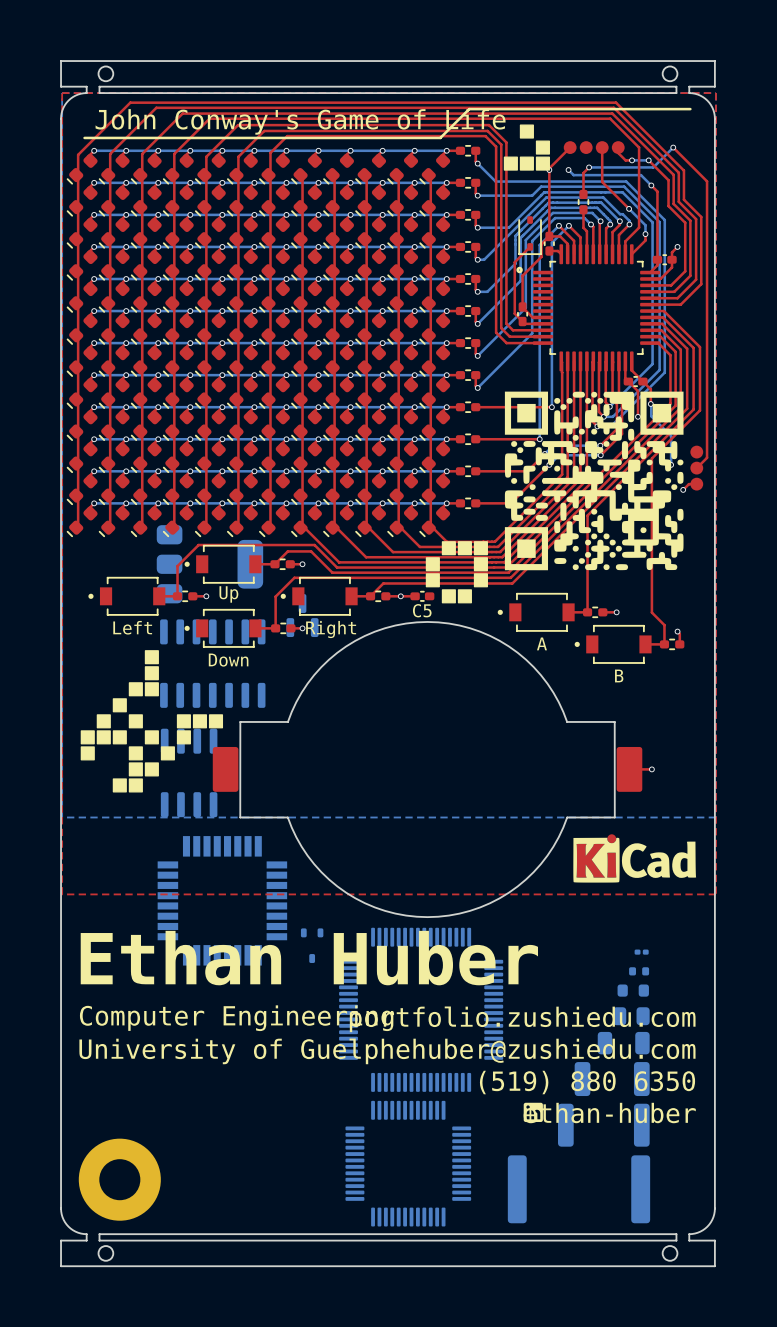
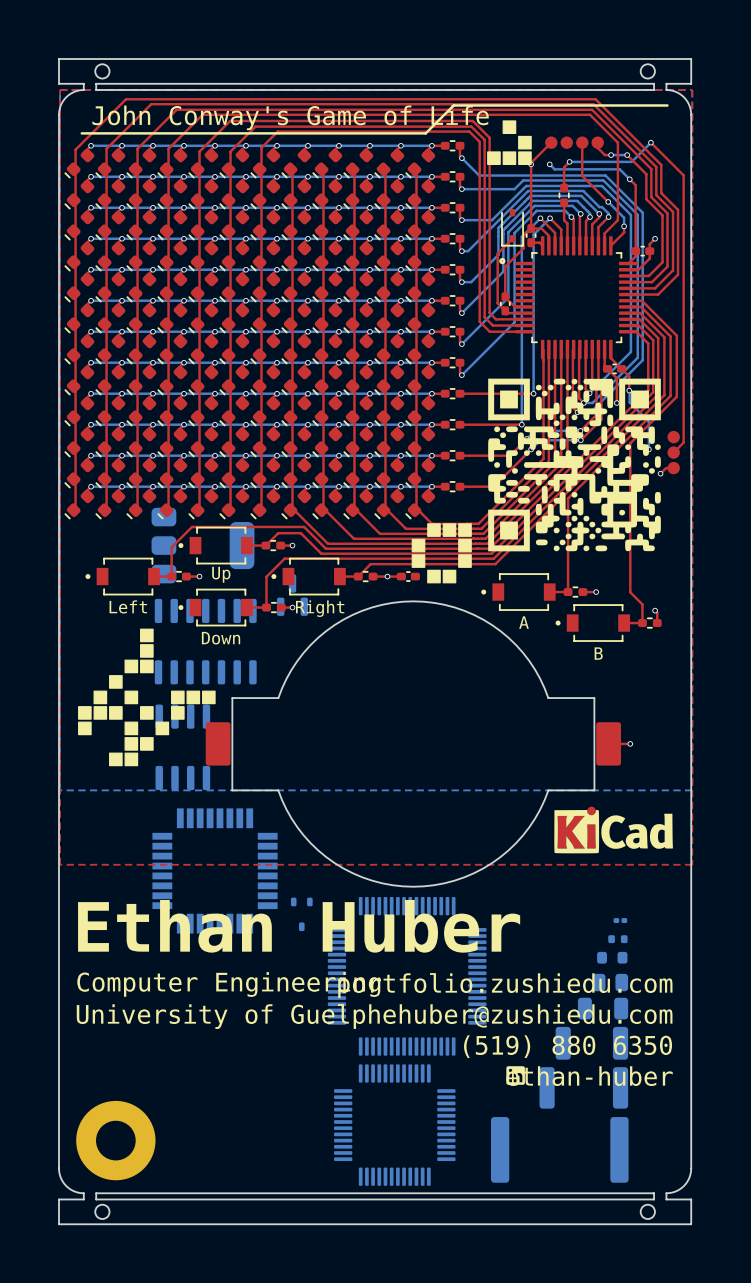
C5 name: C5 (422, 610) -> none

